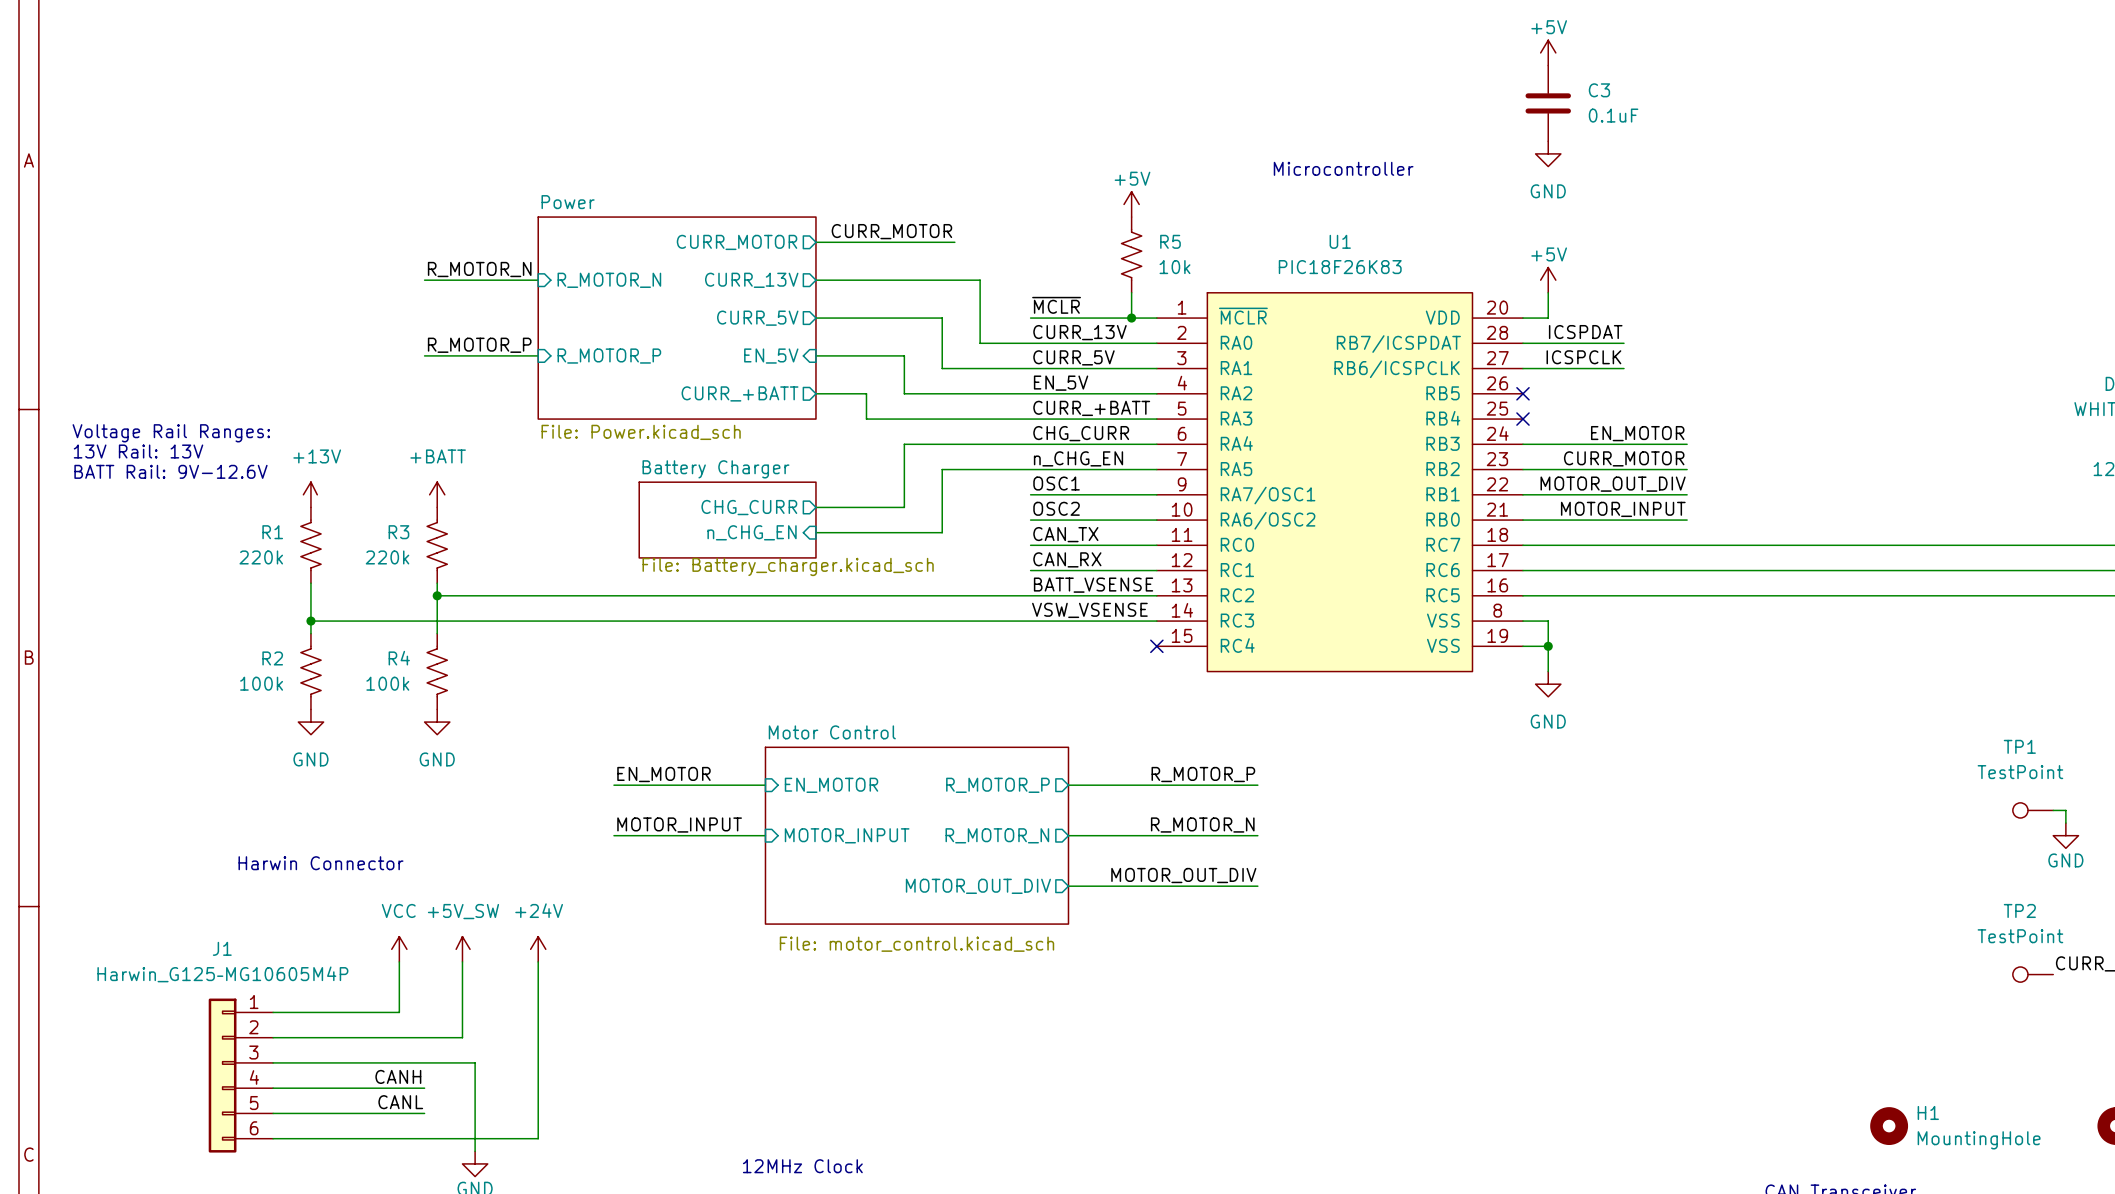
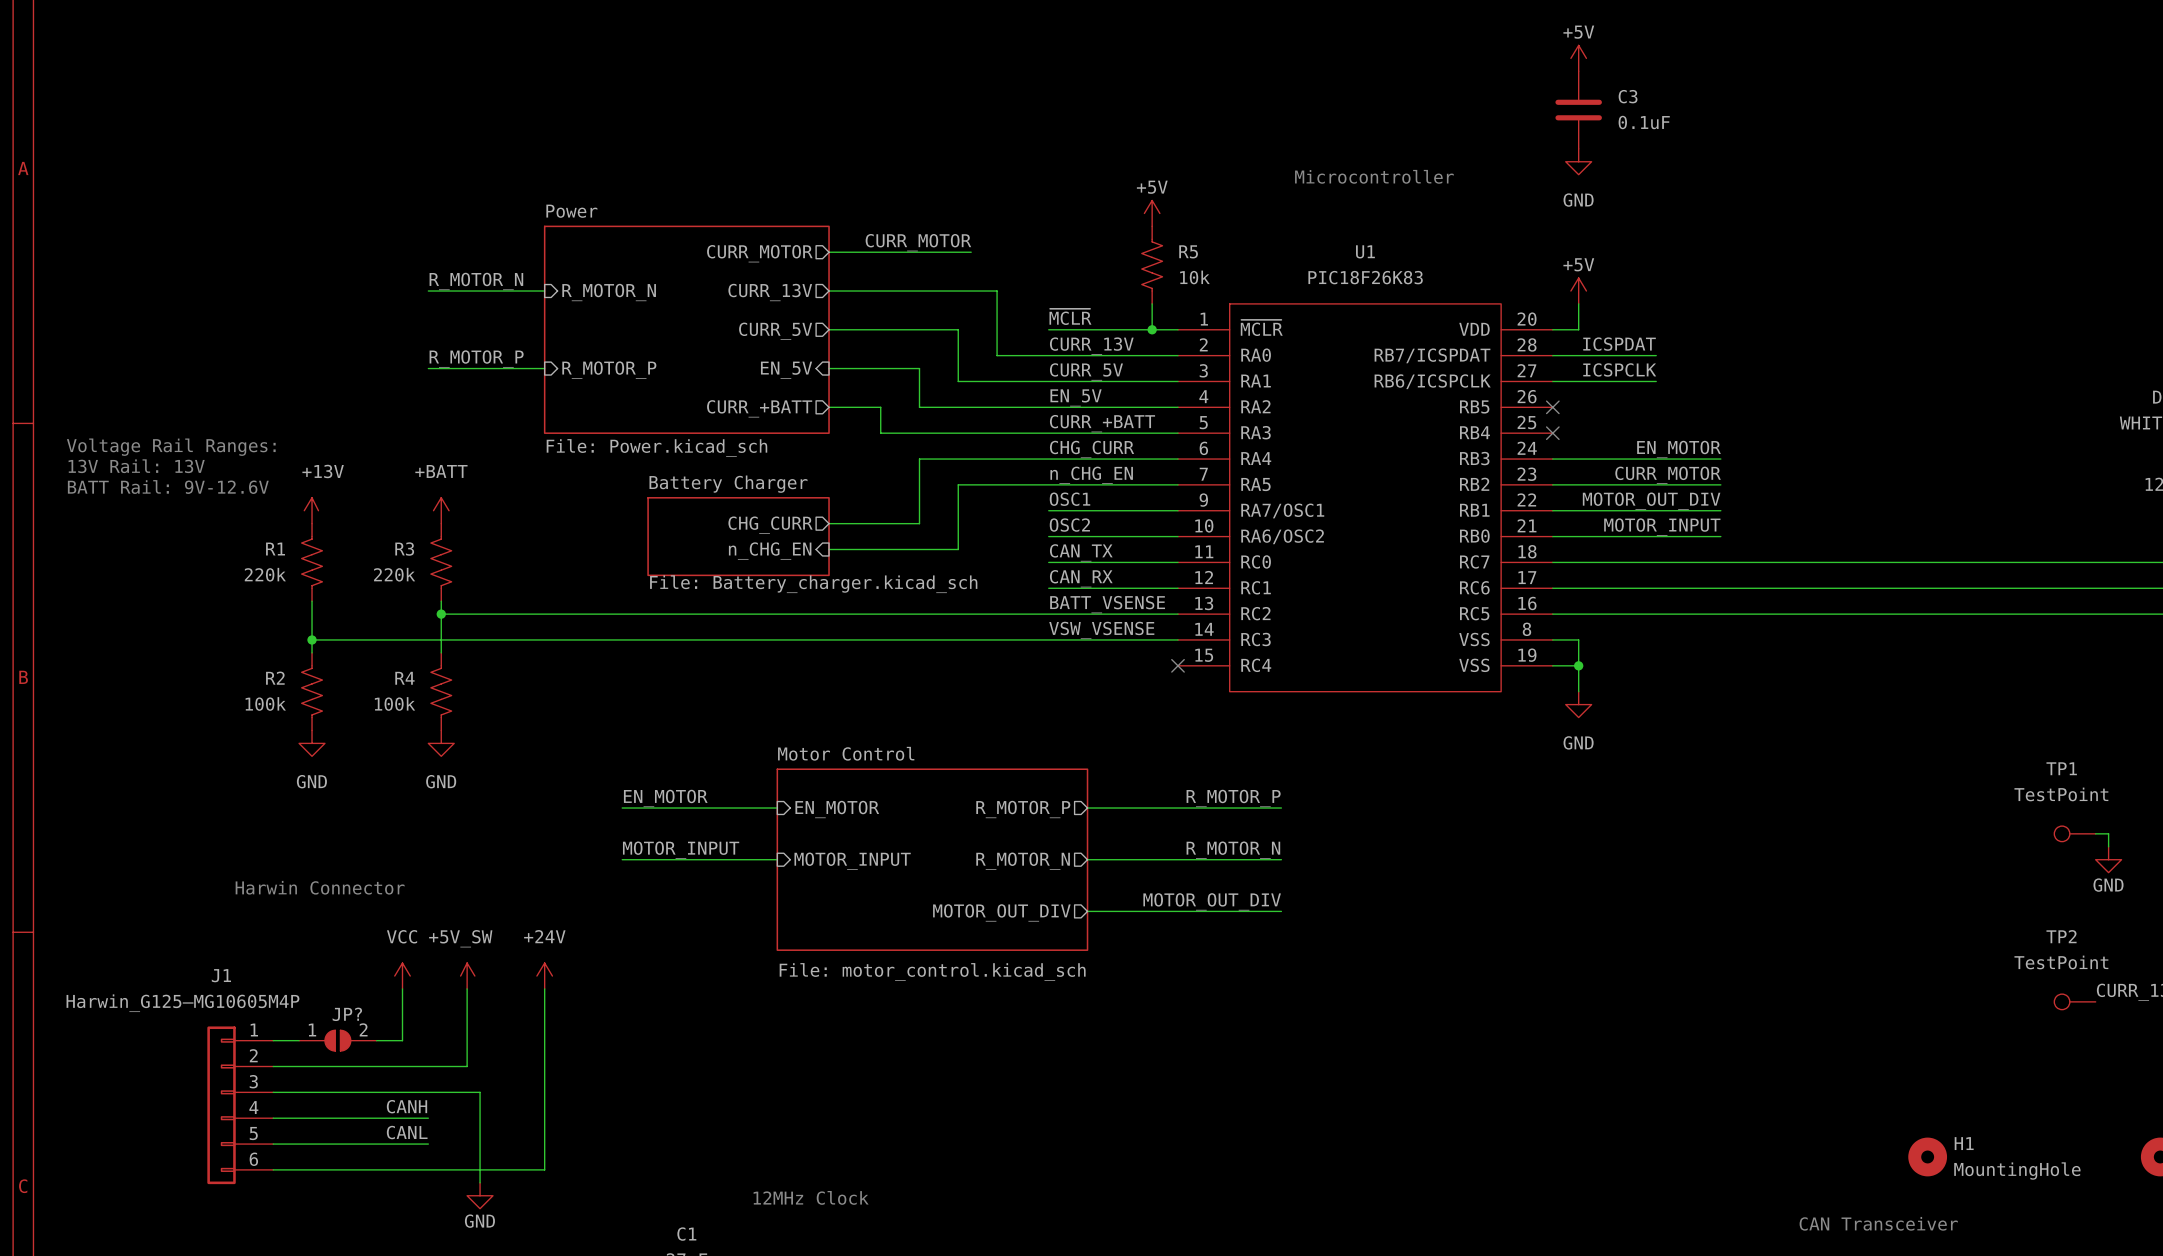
J1 value position: Harwin_G125–MG10605M4P (222, 974) -> Harwin_G125–MG10605M4P (182, 1003)
JP?: none -> (337, 1040)

